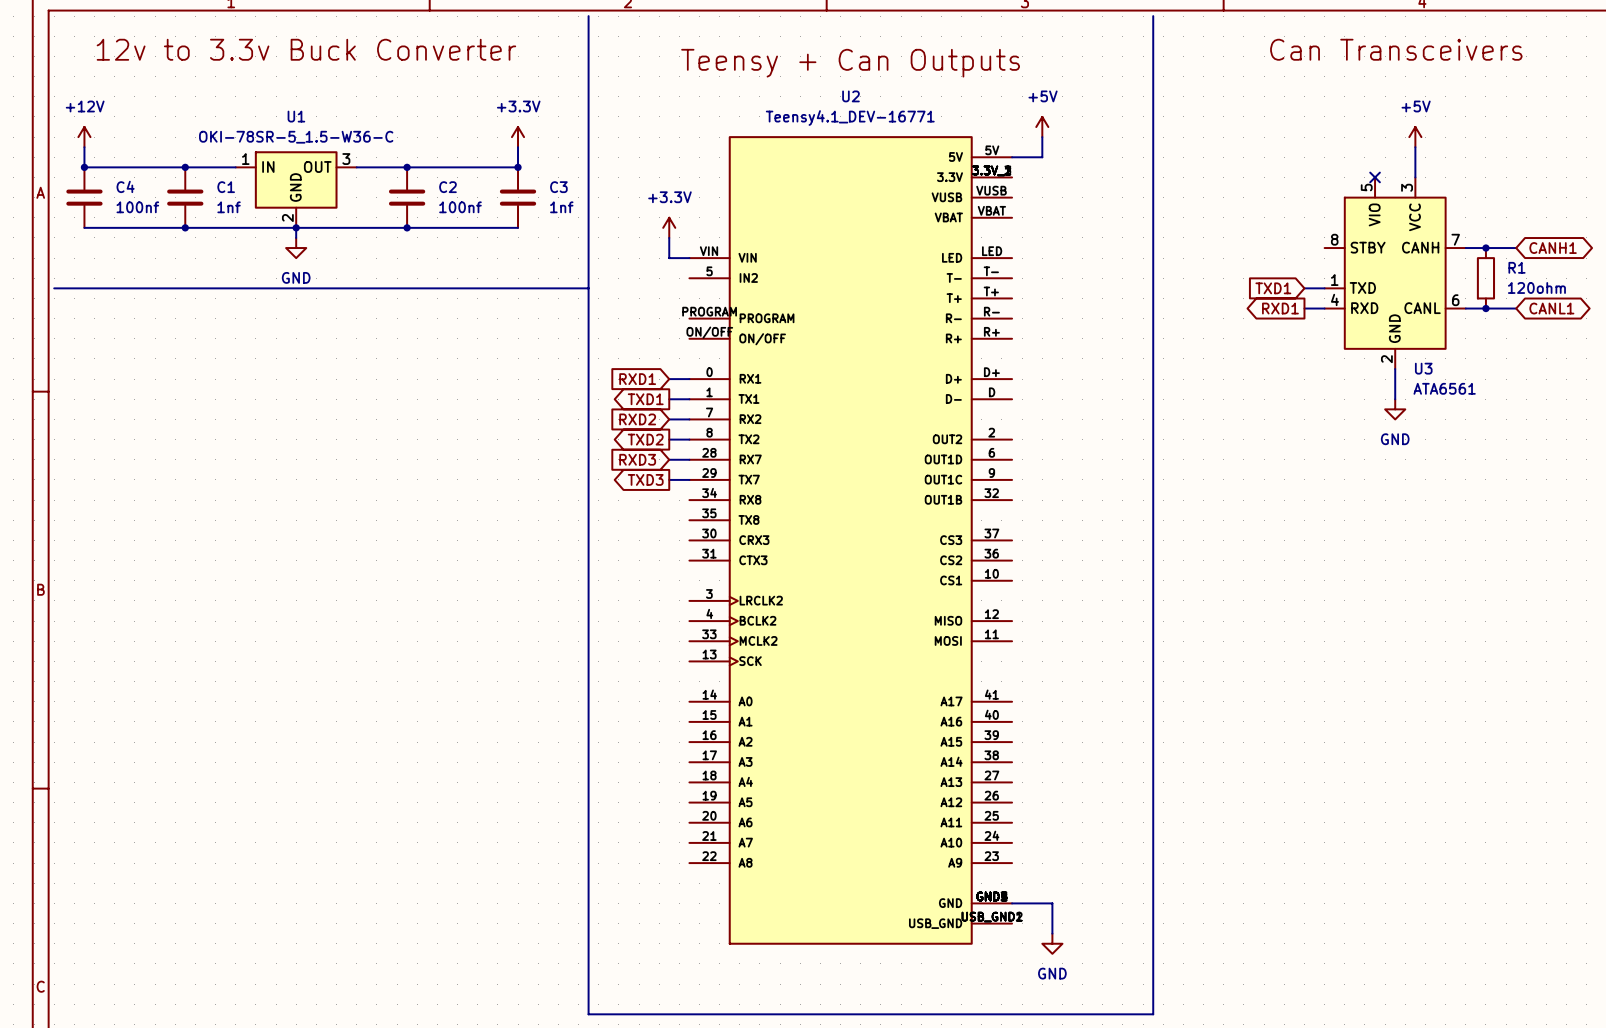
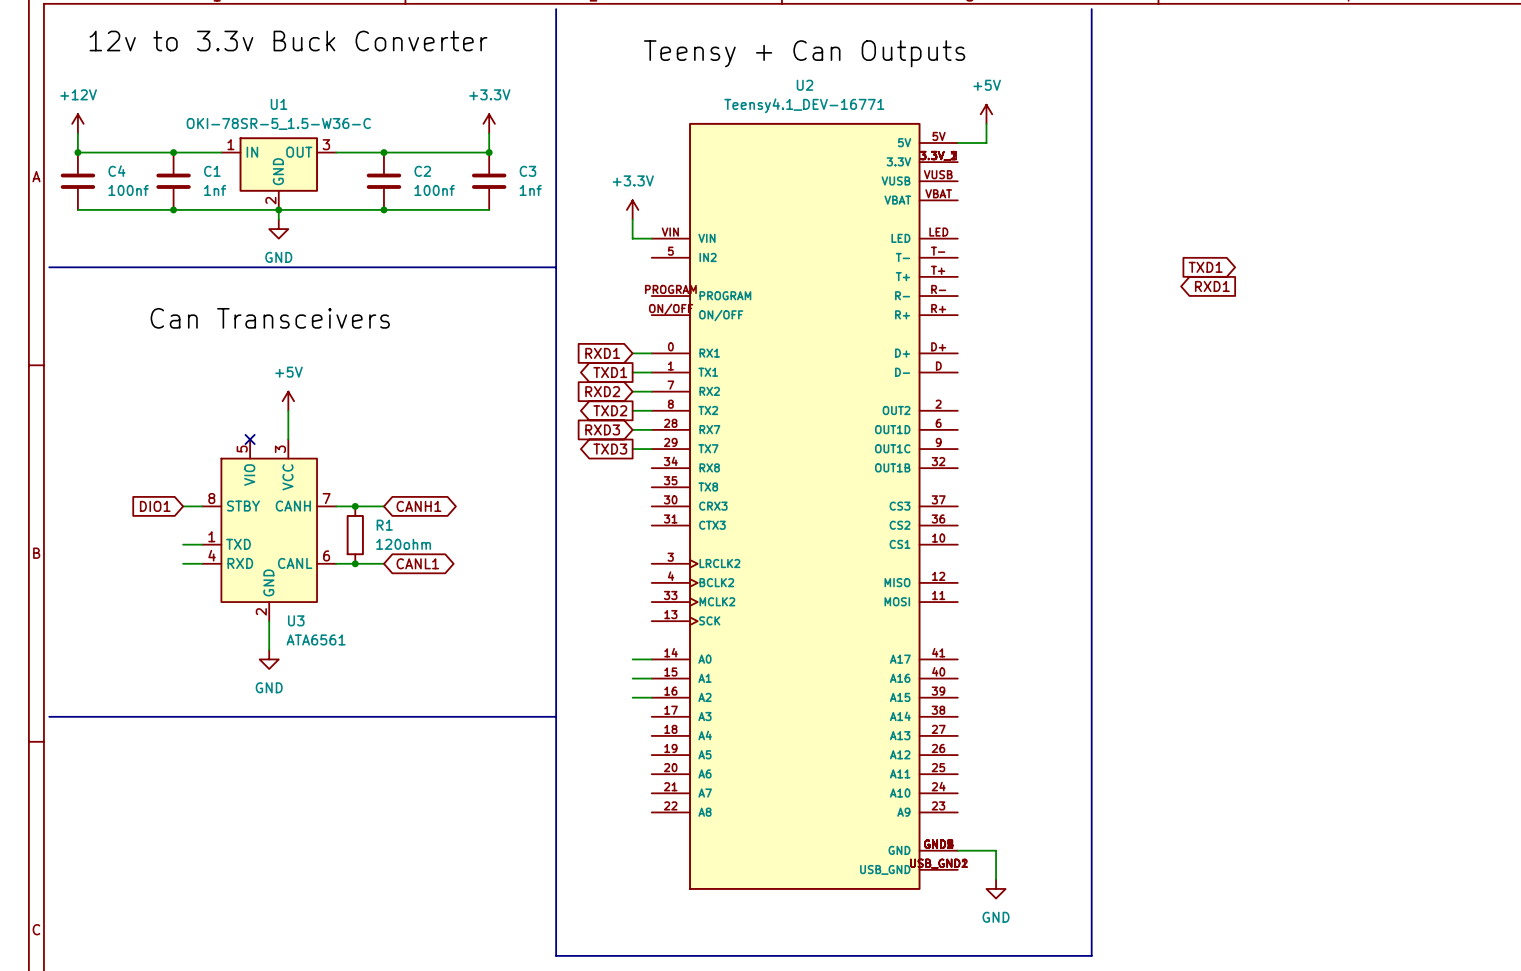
label: Can Transceivers (1396, 49) -> none
power symbol: +5V (1415, 137) -> none
wire: (1415, 147) (1415, 177) -> none
no-connect mark: (1375, 177) -> none
wire: (1465, 248) (1516, 248) -> none
junction: (1485, 248) -> none
global label: CANH1 (1553, 248) -> none
U3 position: (1395, 273) -> (269, 530)
R1 position: (1485, 278) -> (355, 535)
wire: (1304, 288) (1324, 288) -> none
wire: (1304, 308) (1324, 308) -> none
wire: (1465, 308) (1516, 308) -> none
junction: (1485, 308) -> none
global label: CANL1 (1551, 308) -> none
label: none -> Can Transceivers (270, 318)
wire: (1395, 369) (1395, 399) -> none
power symbol: GND (1395, 409) -> none
power symbol: none -> +5V (288, 401)
wire: none -> (288, 410) (288, 439)
no-connect mark: none -> (250, 439)
global label: none -> DIO1 (155, 506)
wire: none -> (183, 506) (202, 506)
wire: none -> (336, 506) (383, 506)
junction: none -> (355, 506)
global label: none -> CANH1 (418, 506)
wire: none -> (183, 544) (202, 544)
wire: none -> (183, 563) (202, 563)
wire: none -> (336, 563) (383, 563)
junction: none -> (355, 563)
global label: none -> CANL1 (417, 563)
wire: none -> (269, 621) (269, 649)
power symbol: none -> GND (269, 659)
wire: none -> (632, 659) (651, 659)
wire: none -> (632, 678) (651, 678)
wire: none -> (632, 697) (651, 697)
line: none -> (49, 716) (556, 716)

